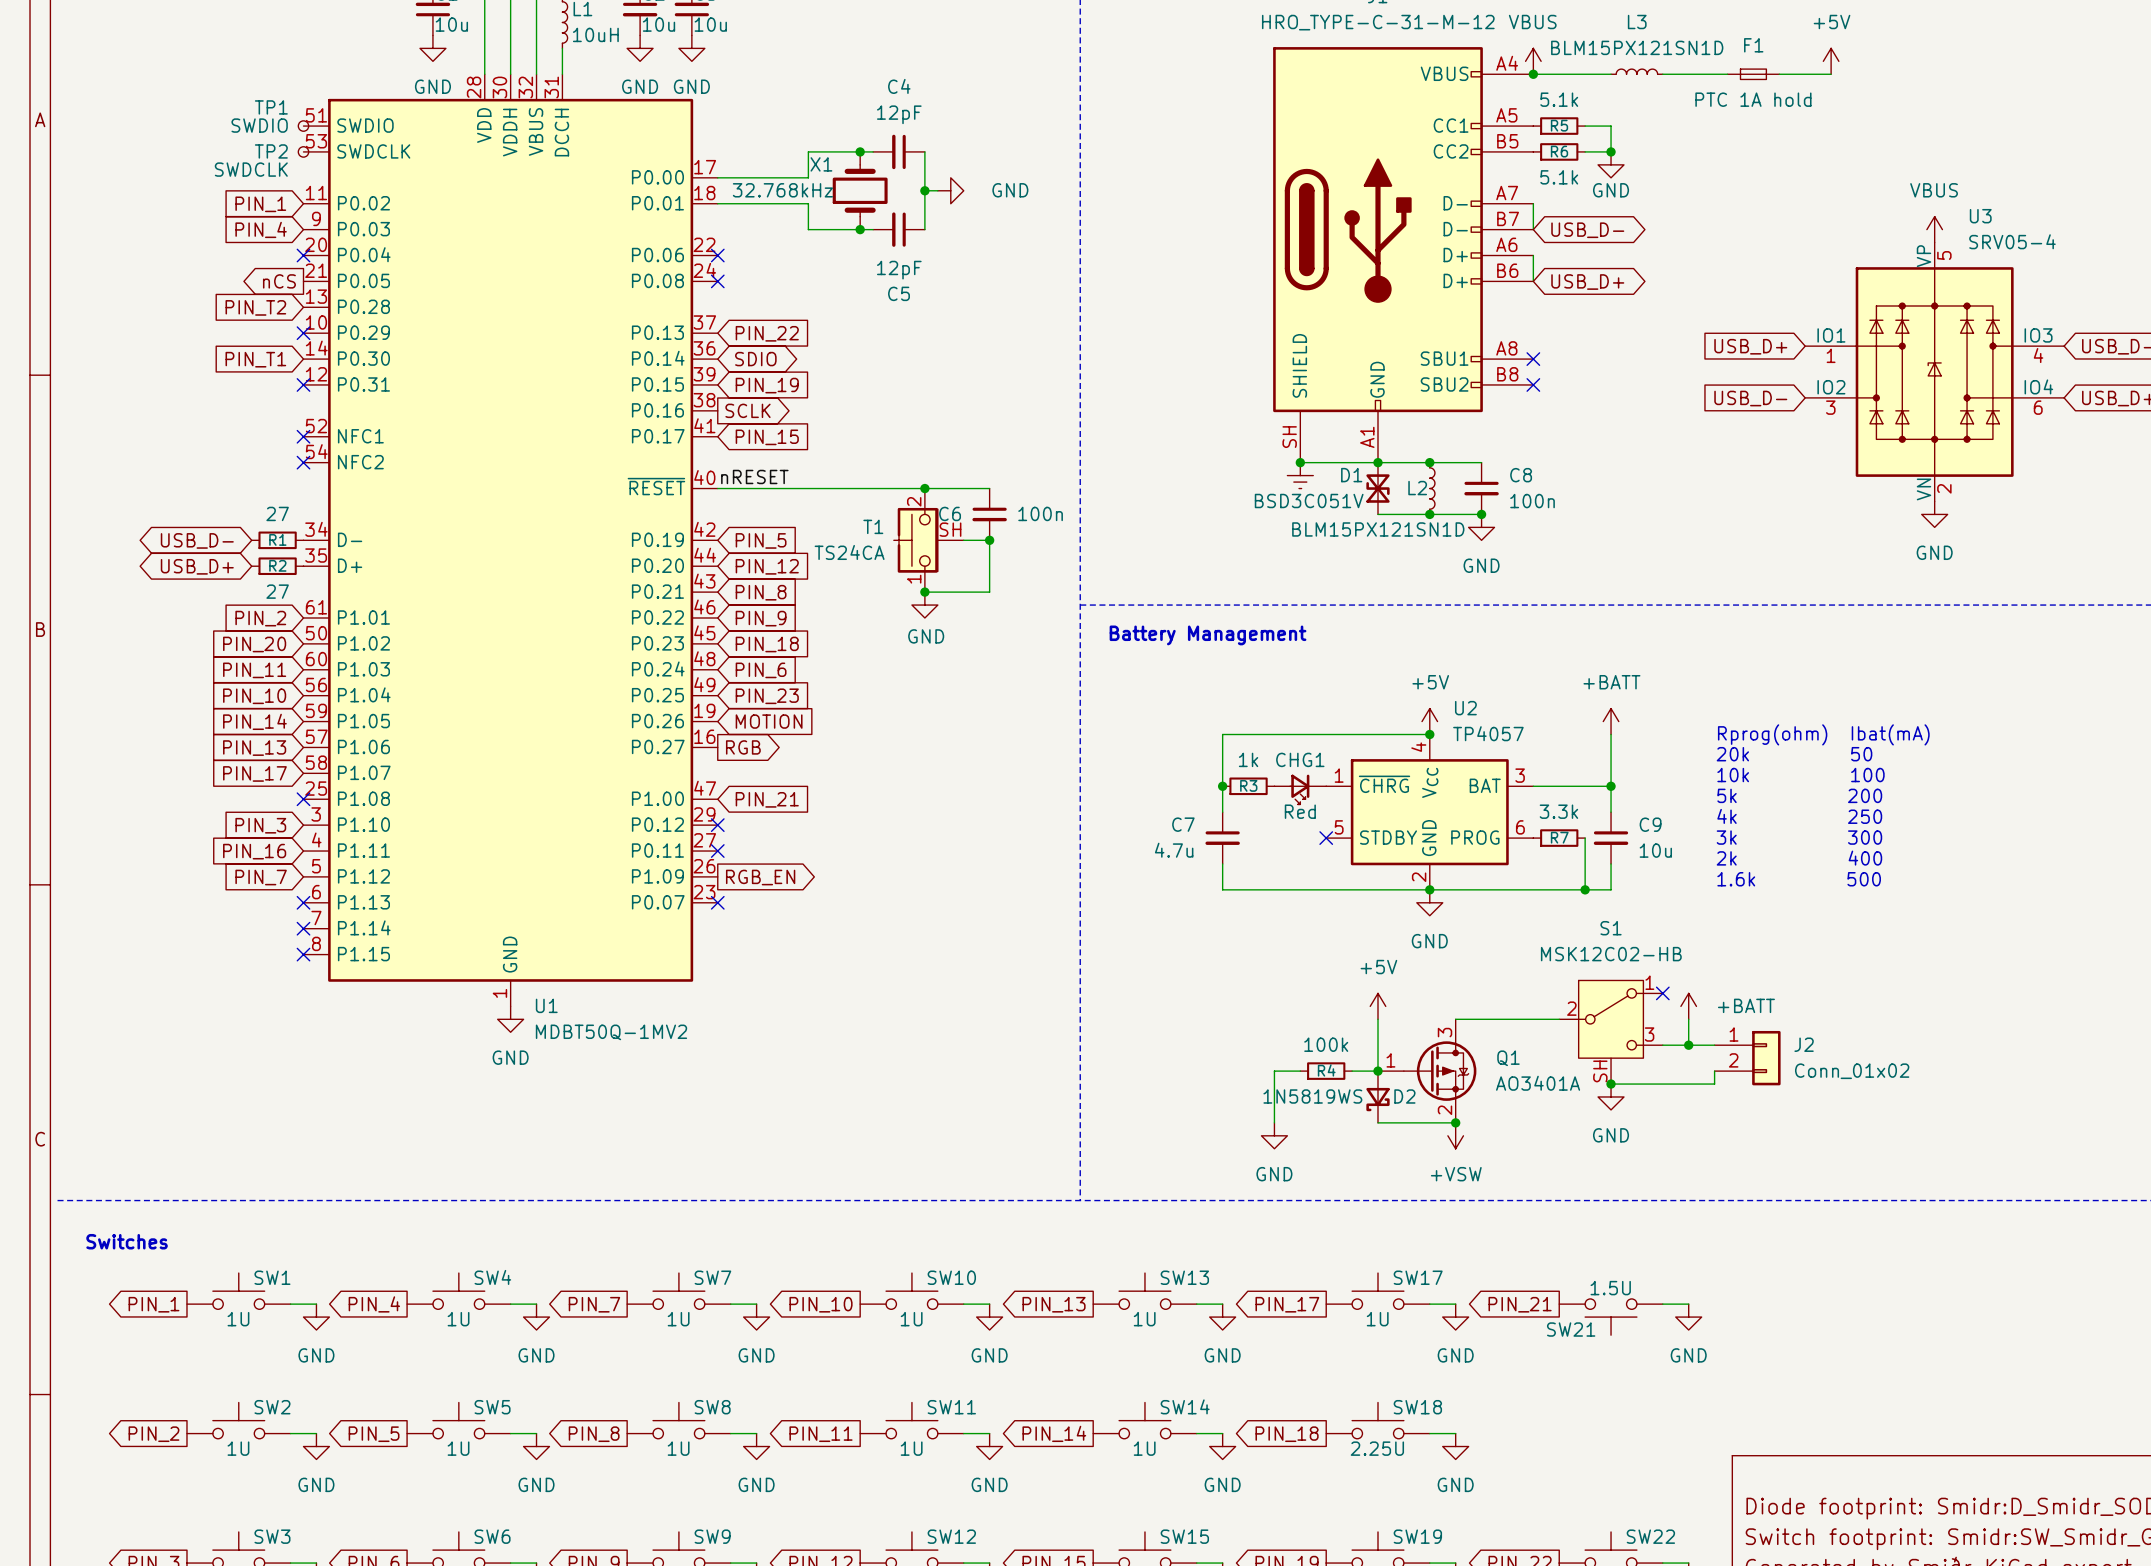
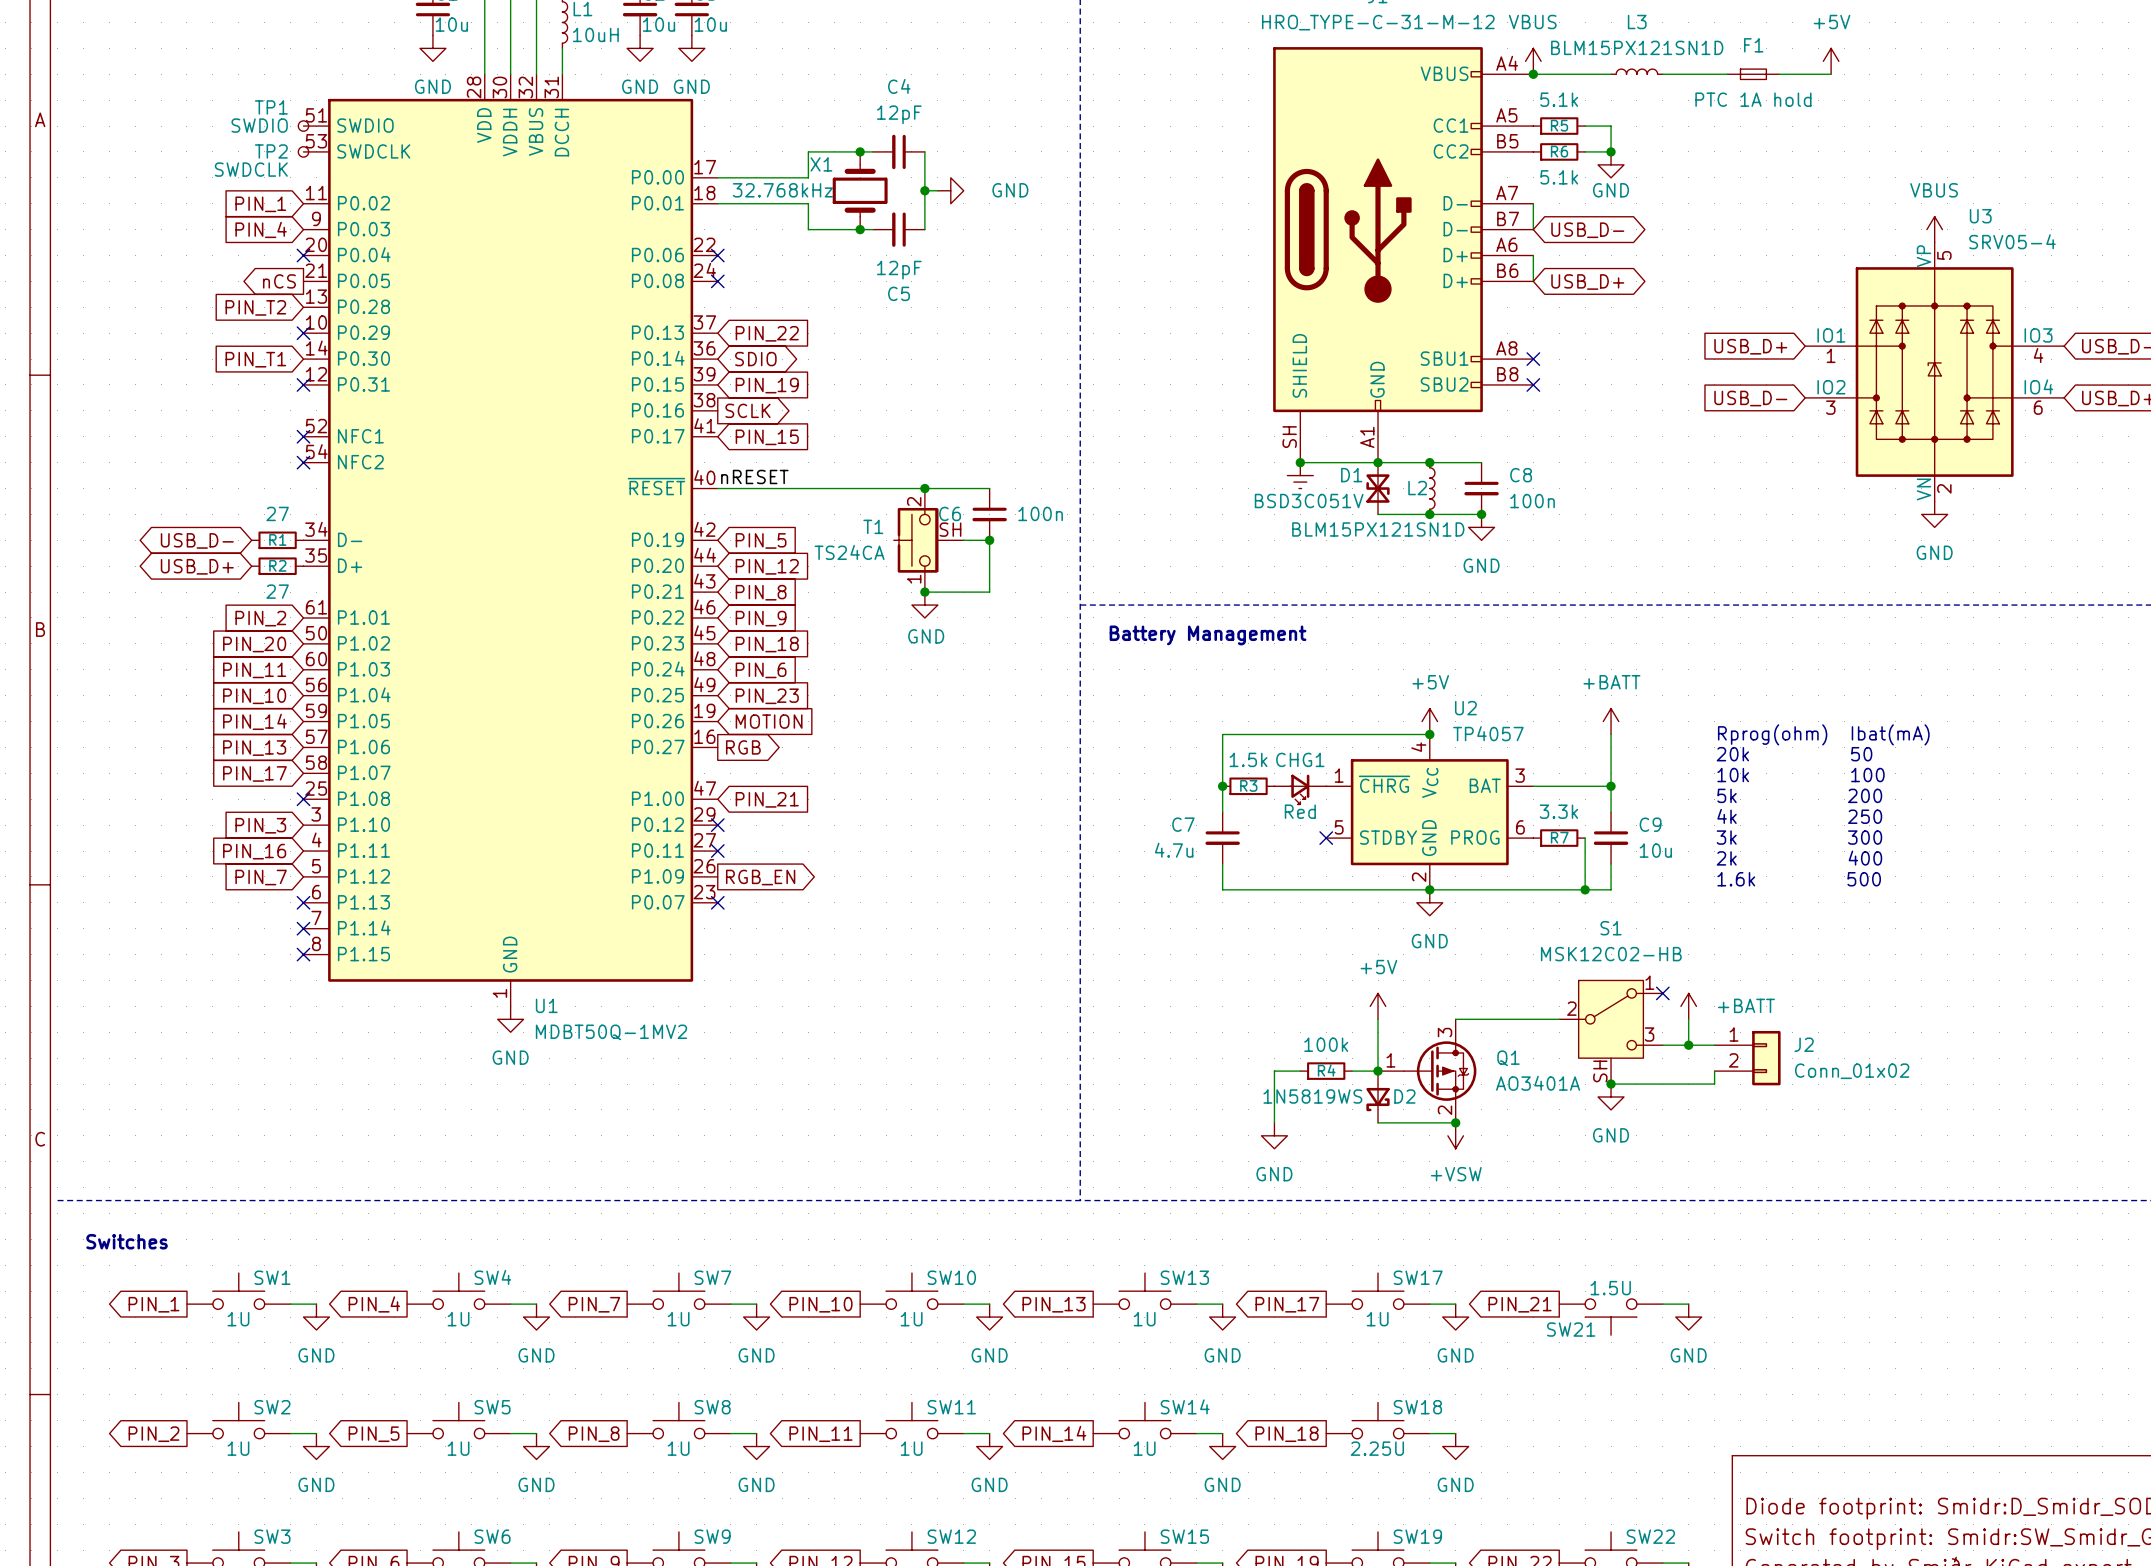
R3 value: 1k (1248, 759) -> 1.5k (1248, 759)

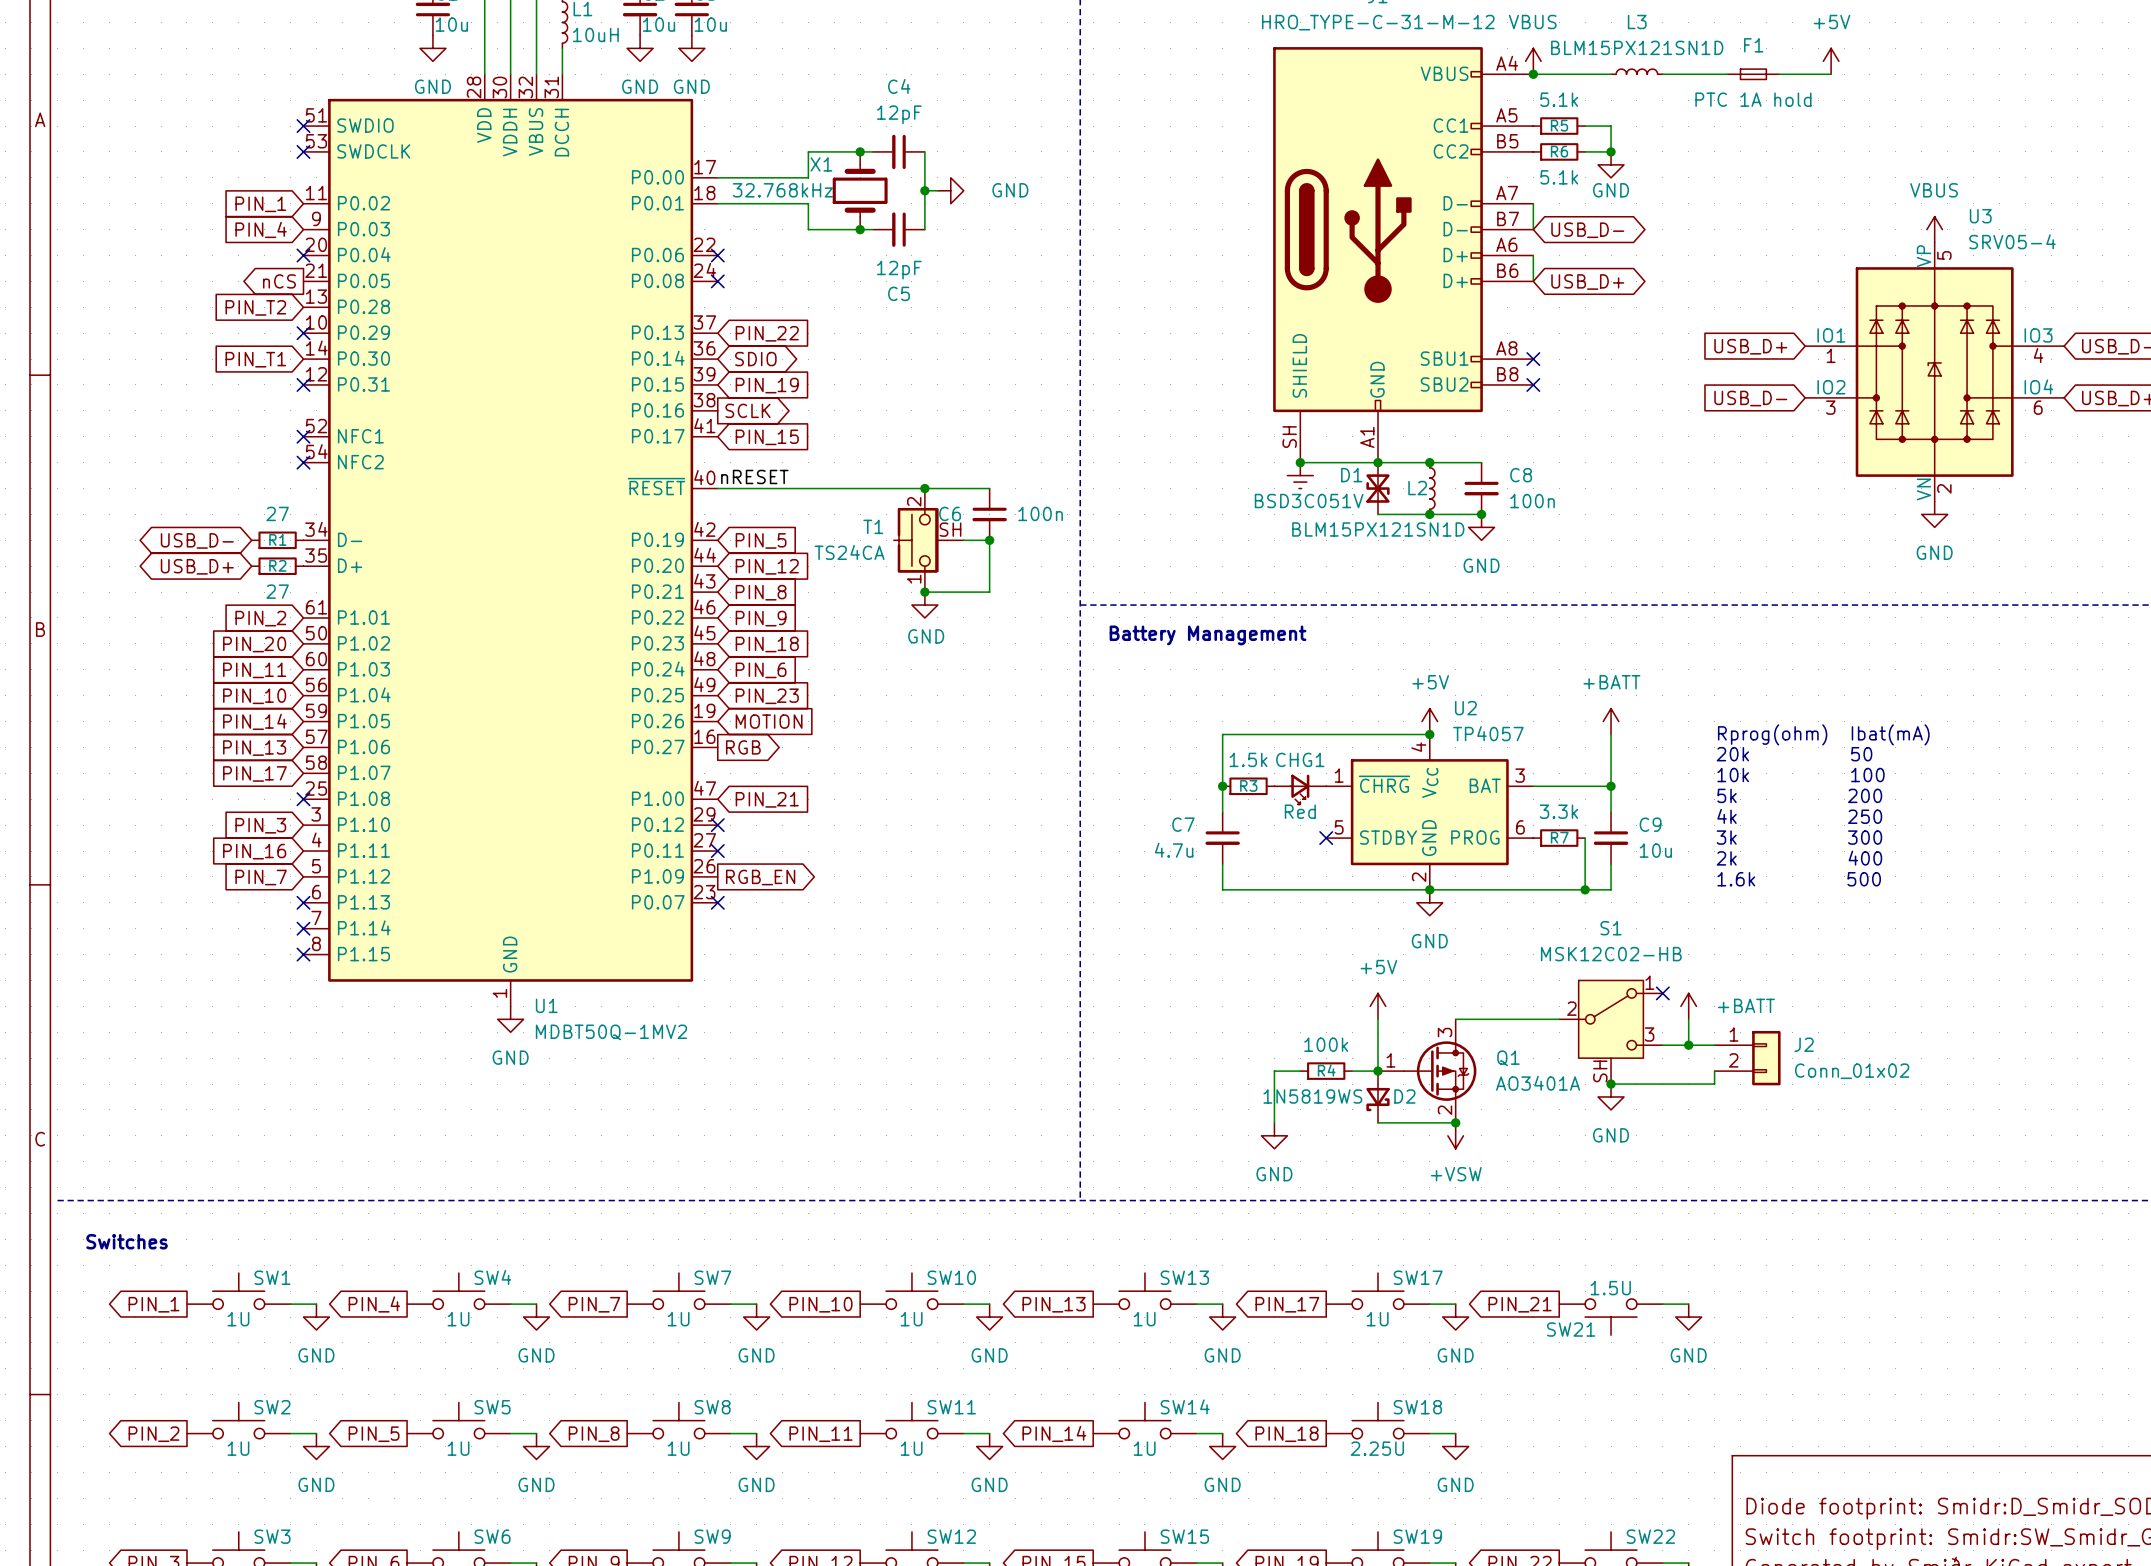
TP1: SWDIO (303, 126) -> none
no-connect mark: none -> (303, 126)
TP2: SWDCLK (303, 151) -> none
no-connect mark: none -> (303, 151)

